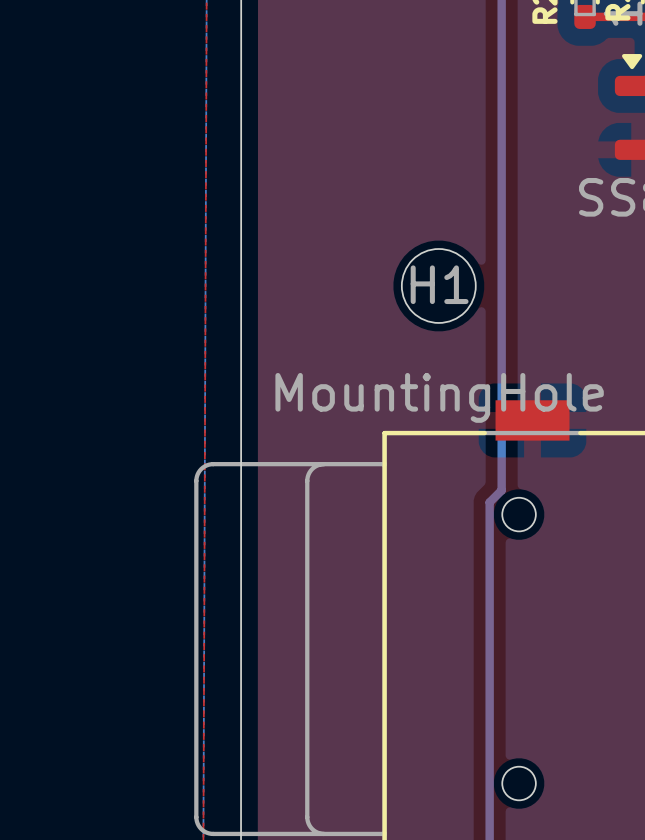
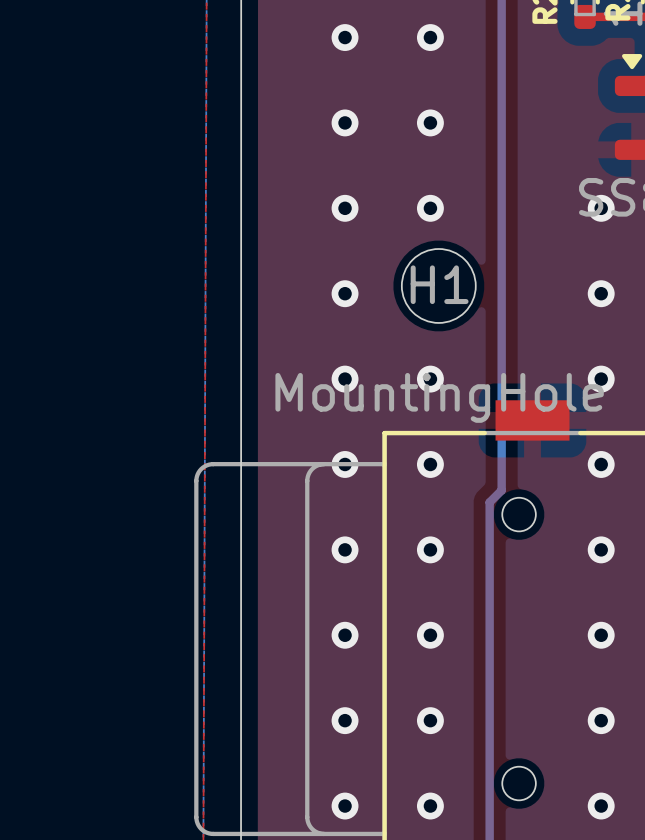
via: none -> (345, 37)
via: none -> (430, 37)
via: none -> (345, 122)
via: none -> (430, 122)
via: none -> (345, 208)
via: none -> (430, 208)
via: none -> (601, 208)
via: none -> (345, 293)
via: none -> (601, 293)
via: none -> (345, 379)
via: none -> (430, 379)
via: none -> (601, 379)
via: none -> (345, 464)
via: none -> (430, 464)
via: none -> (601, 464)
via: none -> (345, 549)
via: none -> (430, 549)
via: none -> (601, 549)
via: none -> (345, 635)
via: none -> (430, 635)
via: none -> (601, 635)
via: none -> (345, 720)
via: none -> (430, 720)
via: none -> (601, 720)
via: none -> (345, 806)
via: none -> (430, 806)
via: none -> (601, 806)

